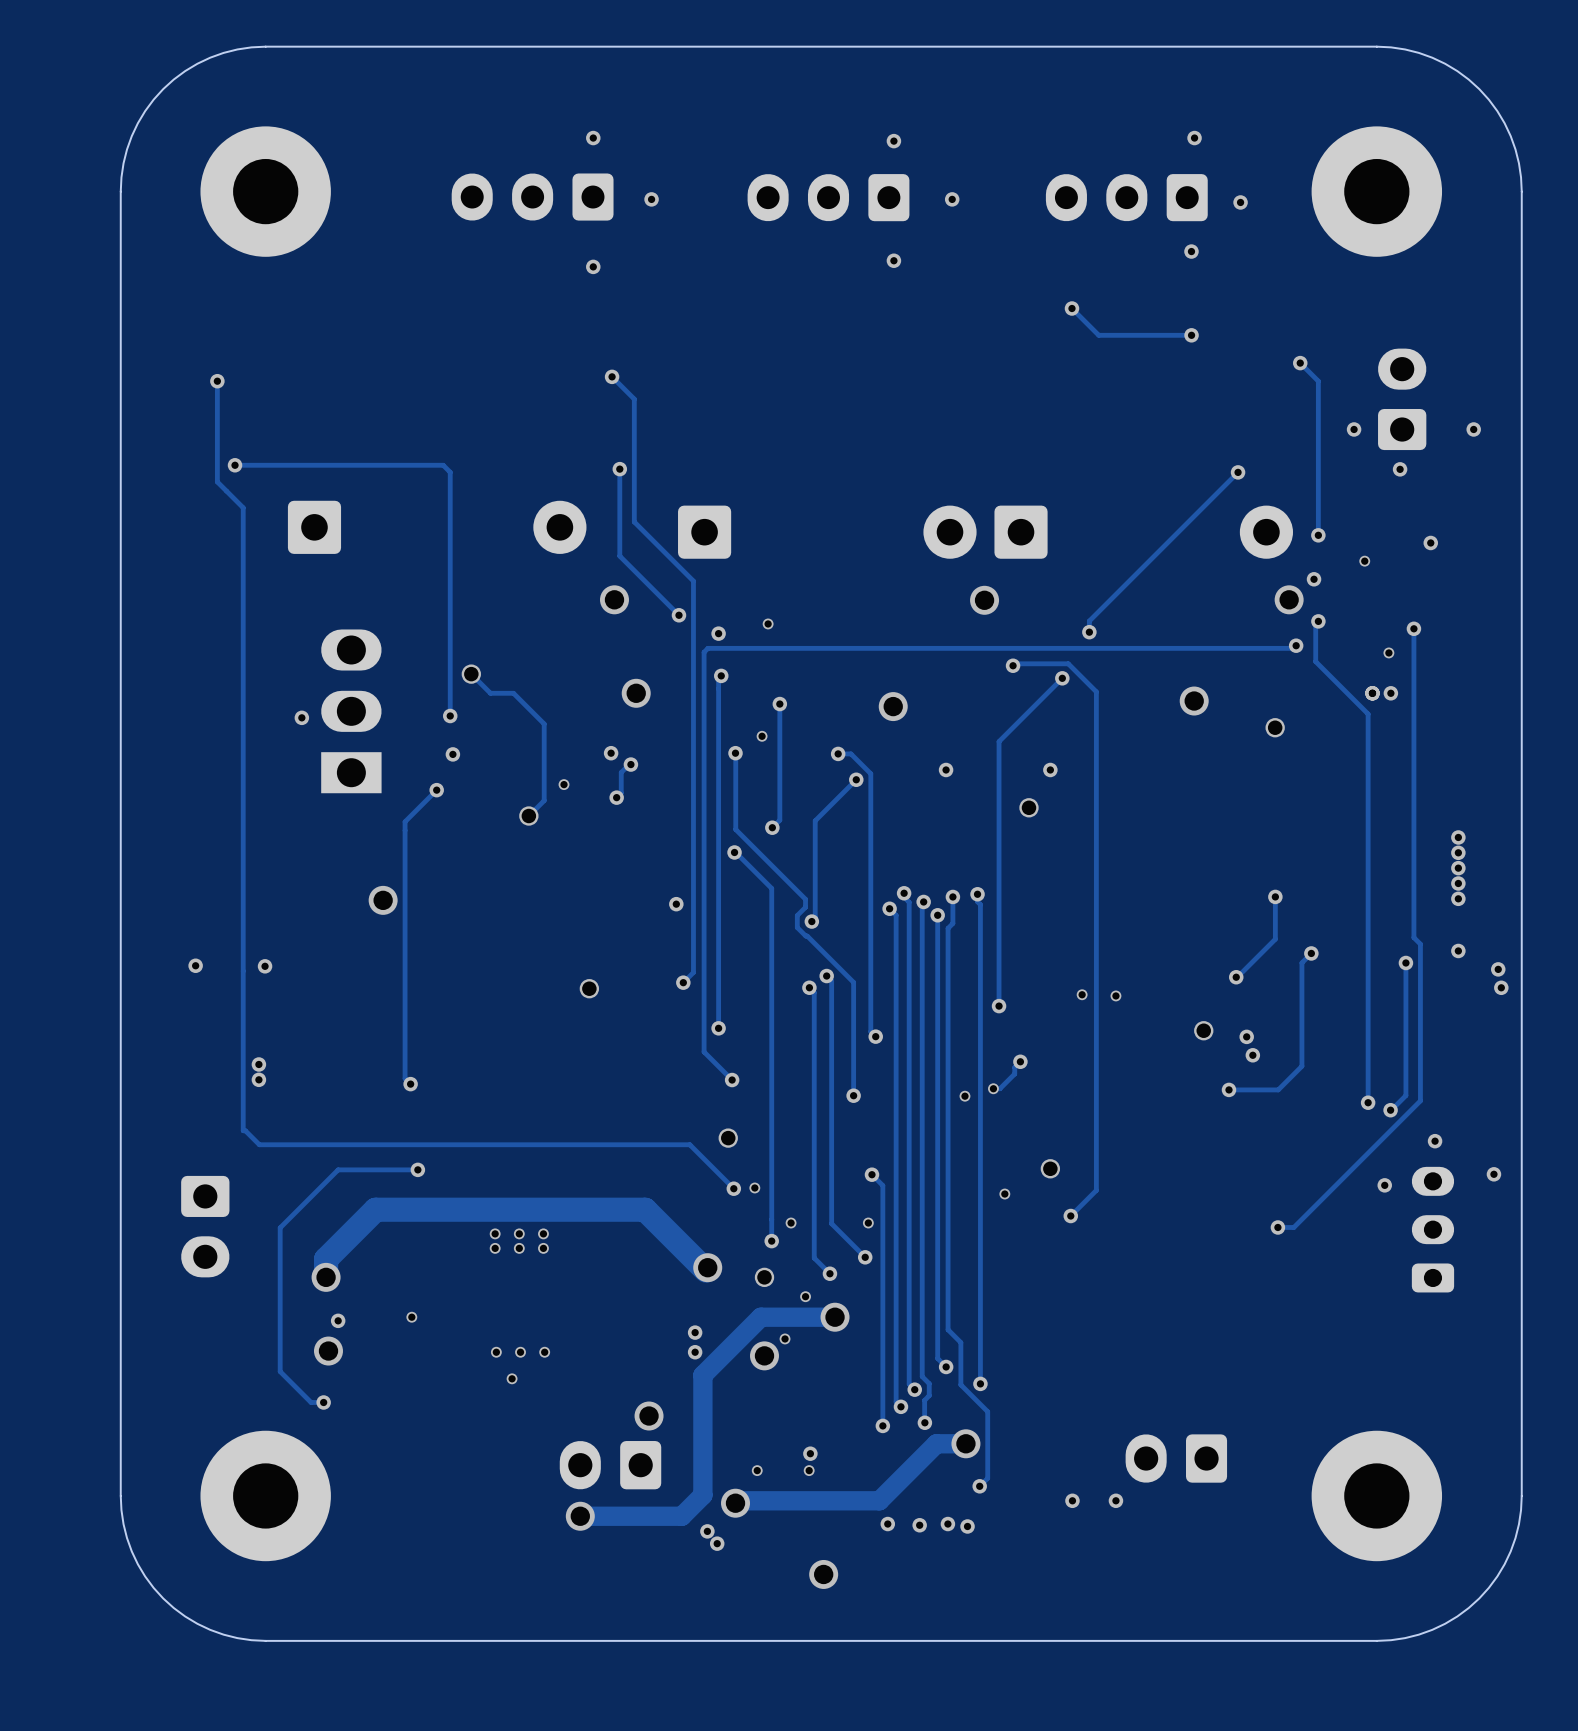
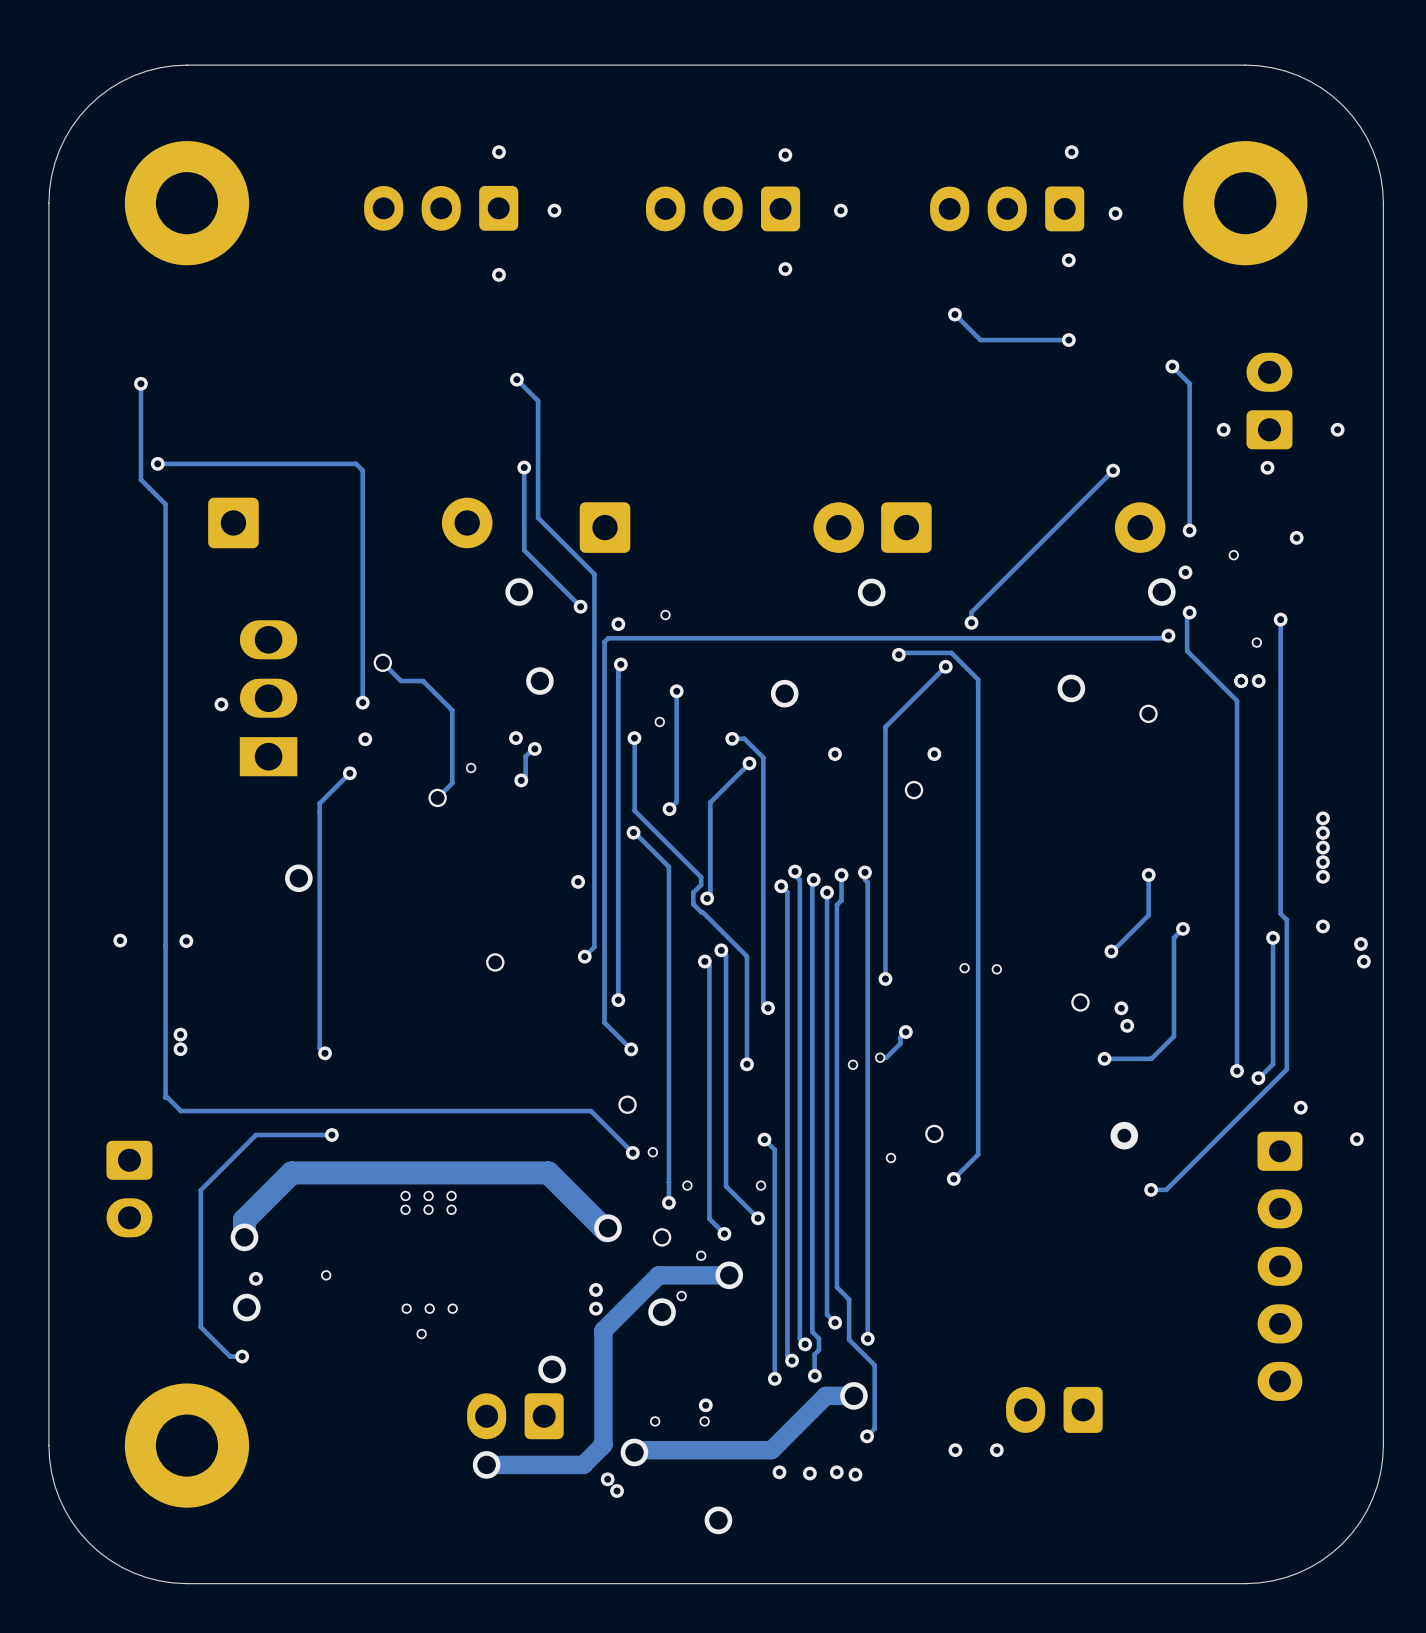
via: none -> (1124, 1135)
via: (1384, 1185) -> none
part: (1432, 1229) -> none
part: none -> (1279, 1266)
part: (1376, 1495) -> none

